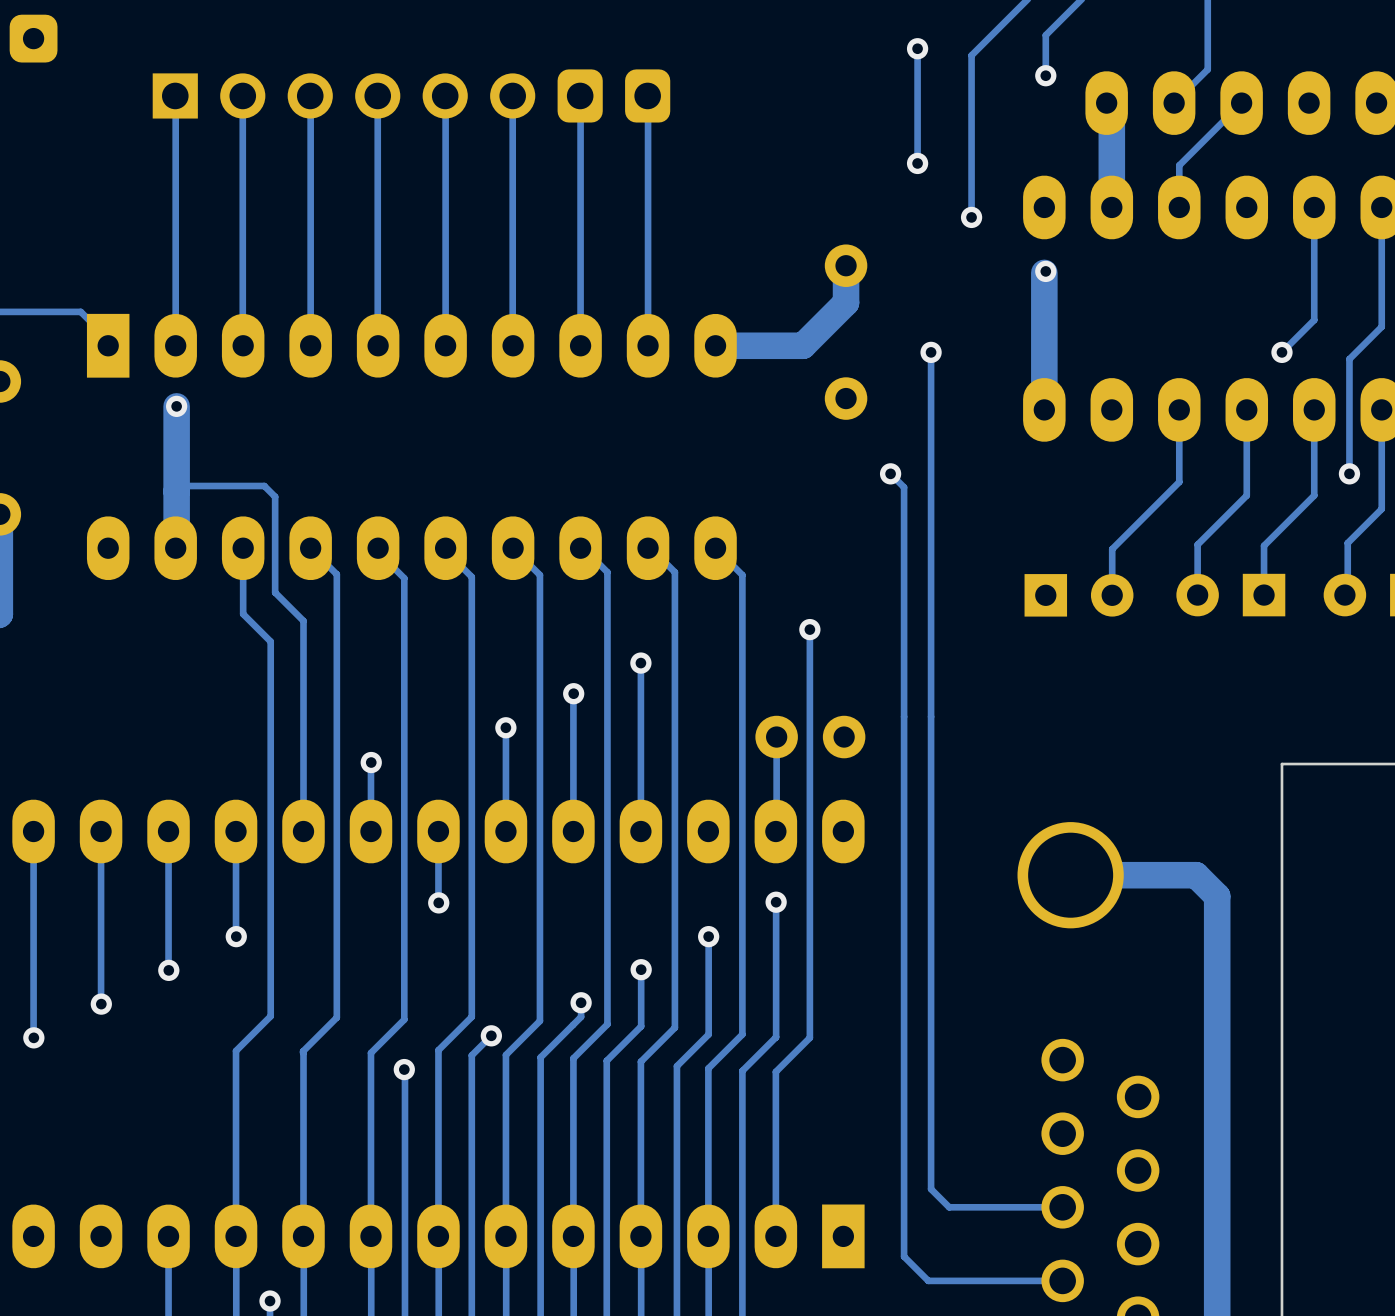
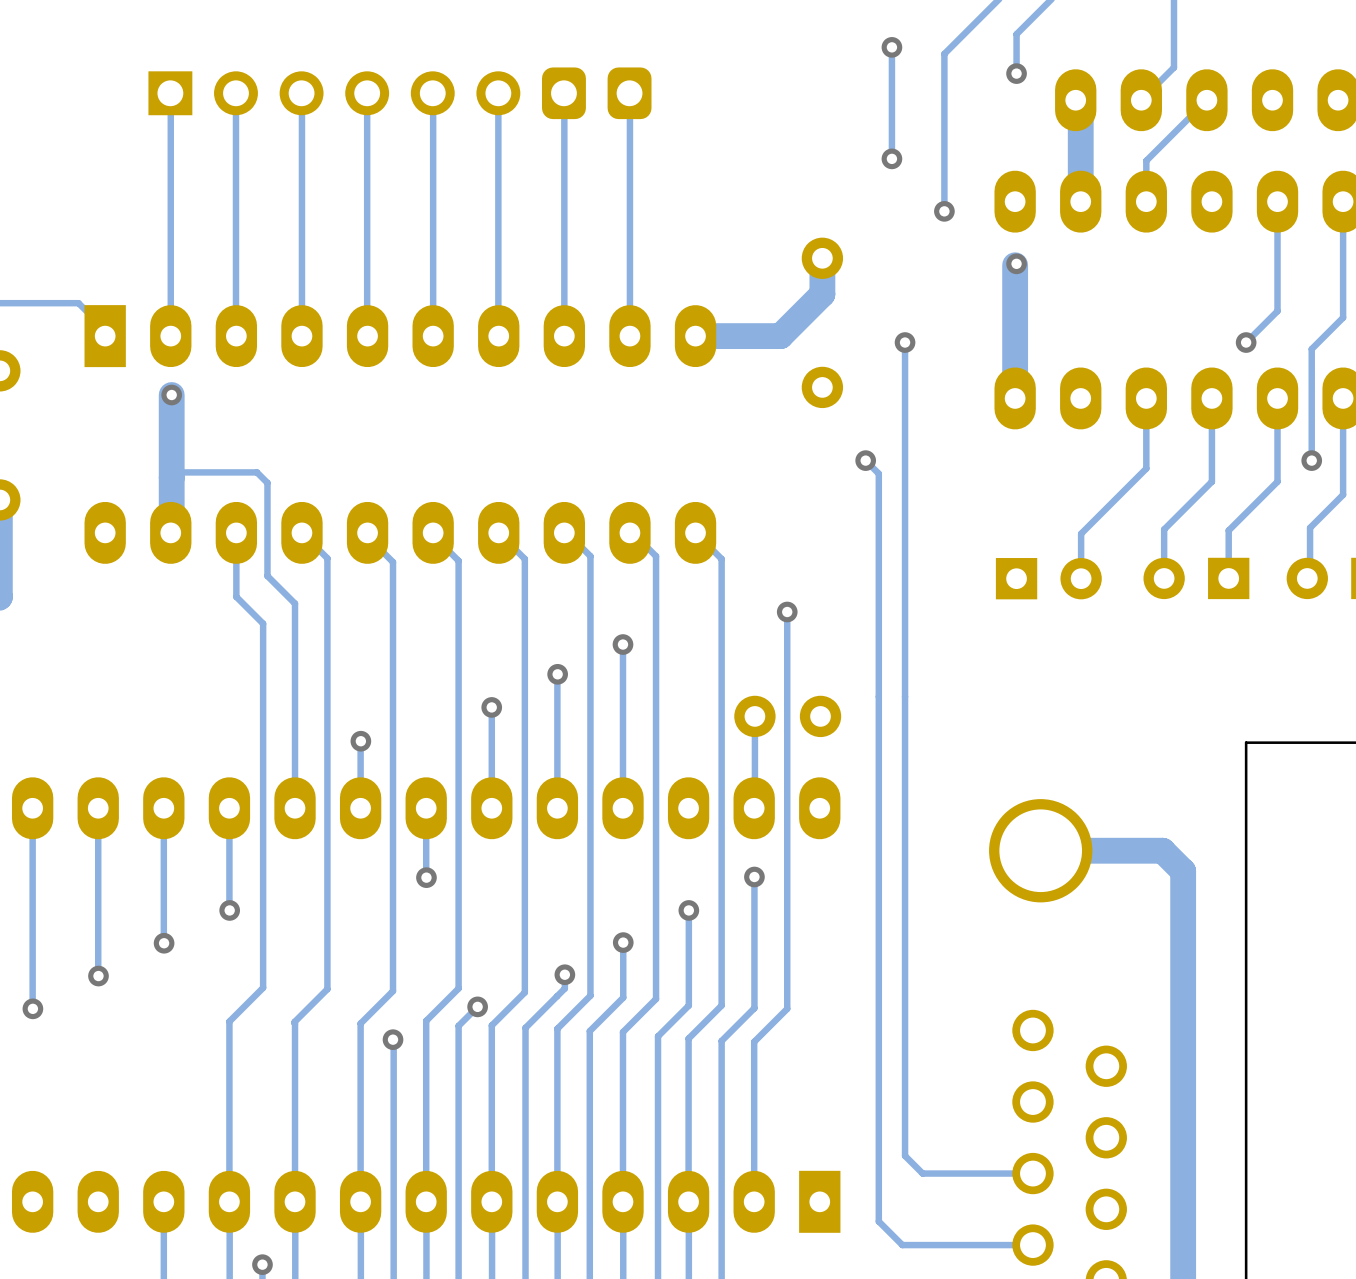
part: (33, 38) -> none

